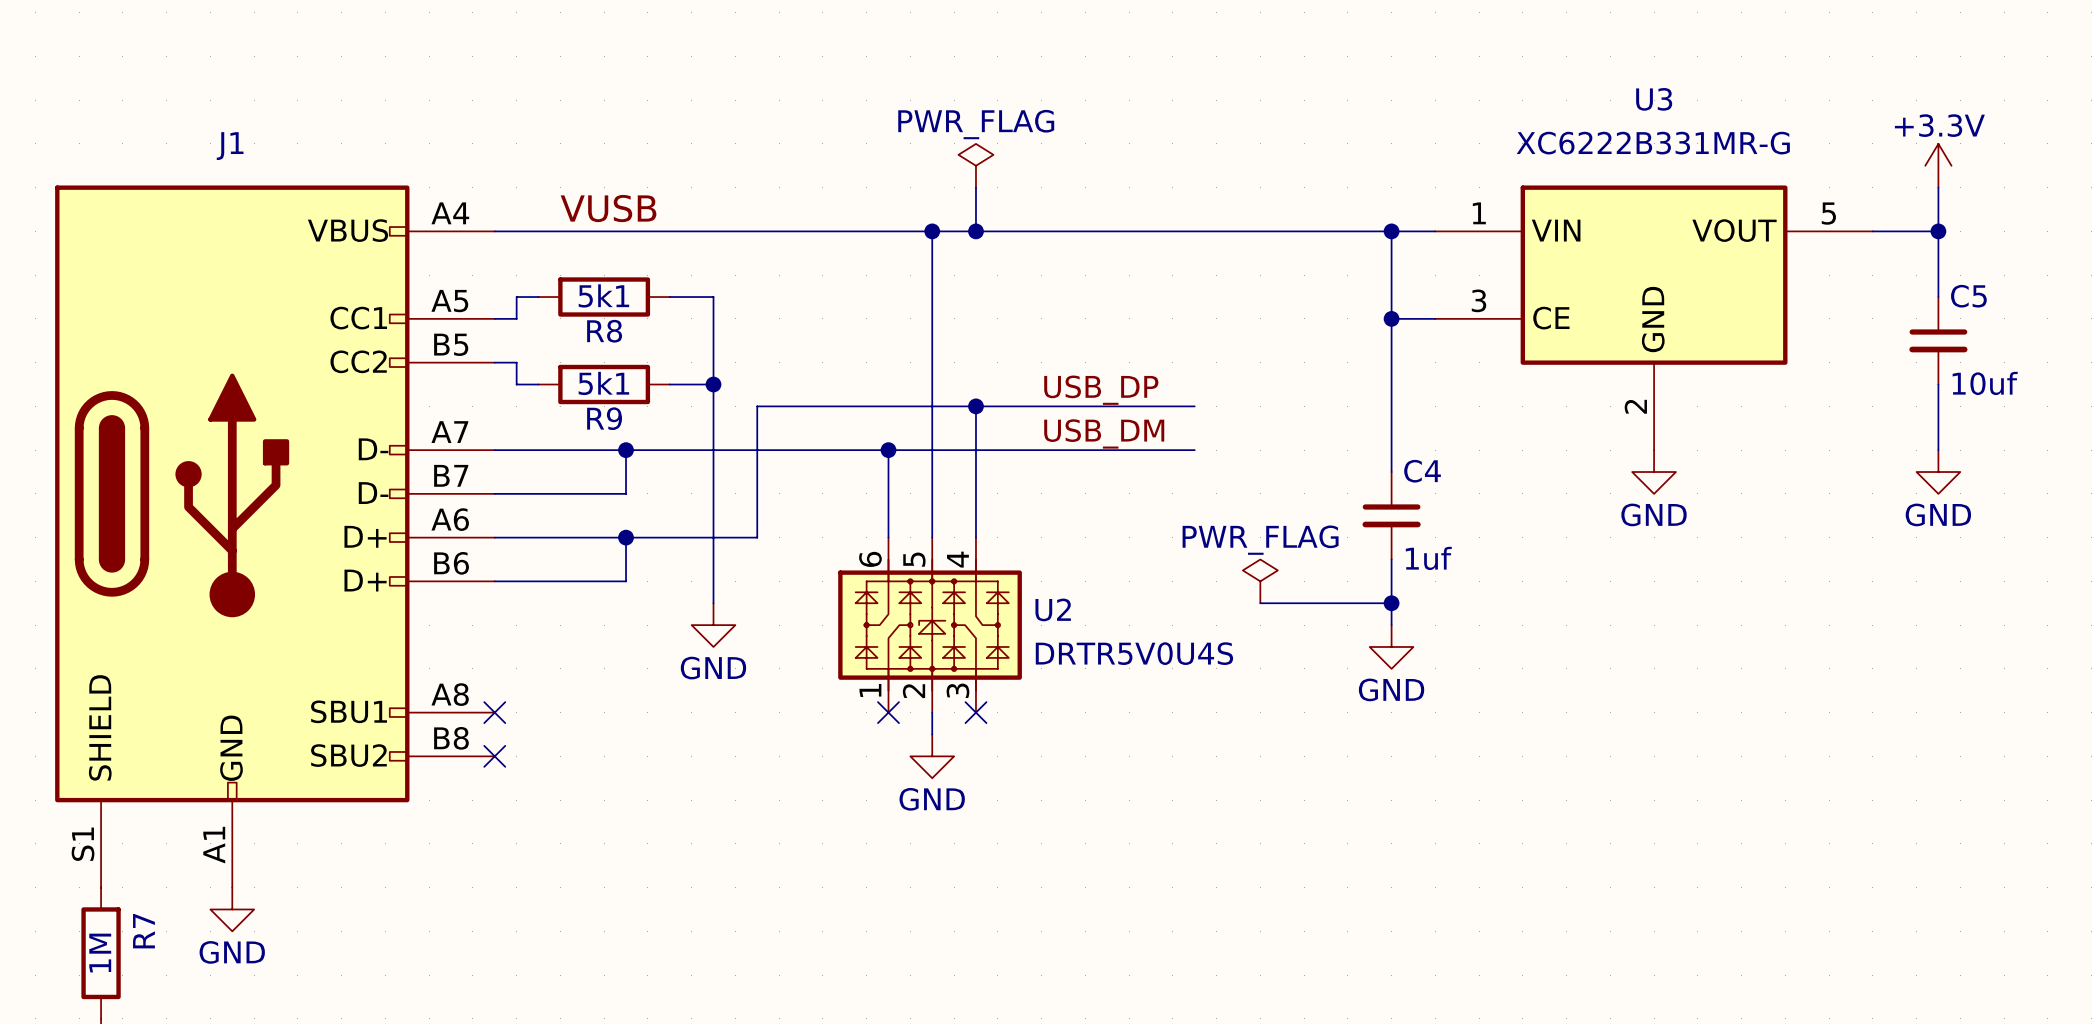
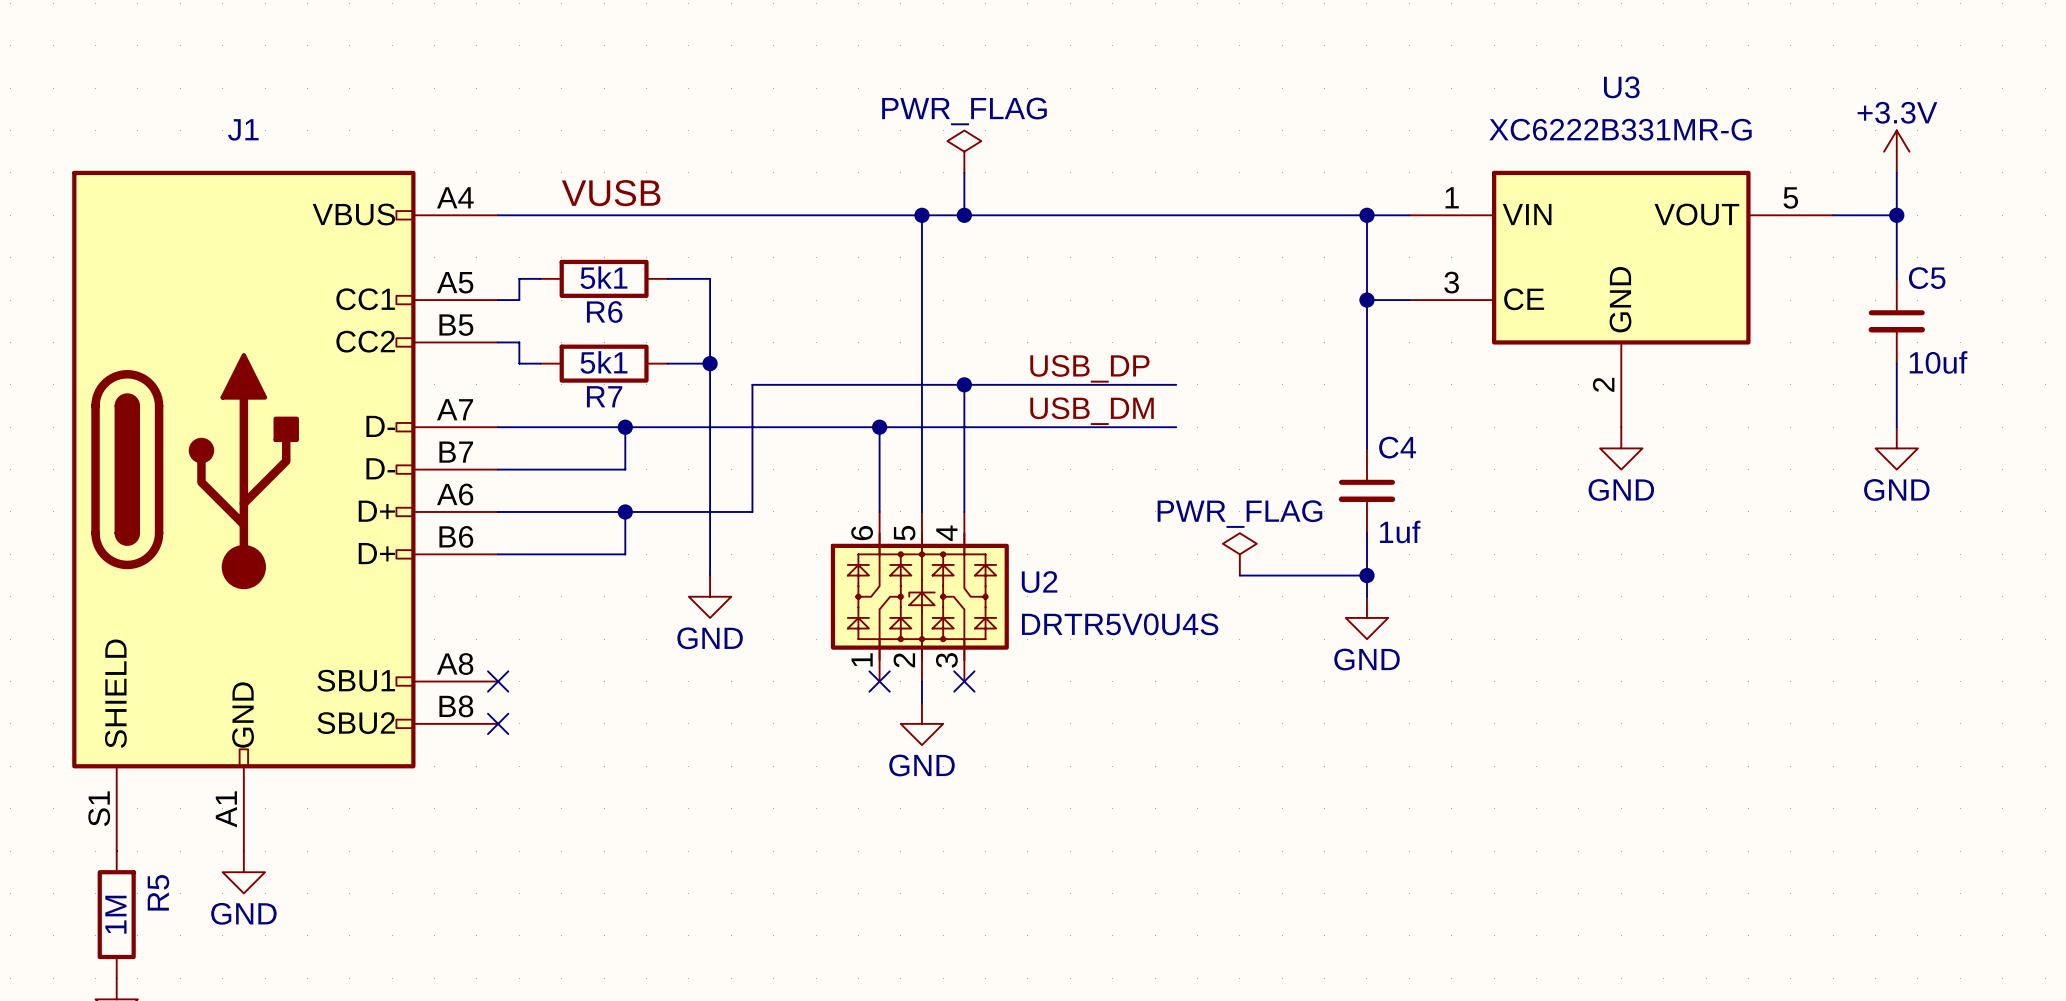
R8 name: R8 (604, 331) -> R6 (604, 311)
R9 name: R9 (604, 418) -> R7 (604, 396)
R7 name: R7 (143, 931) -> R5 (158, 892)

